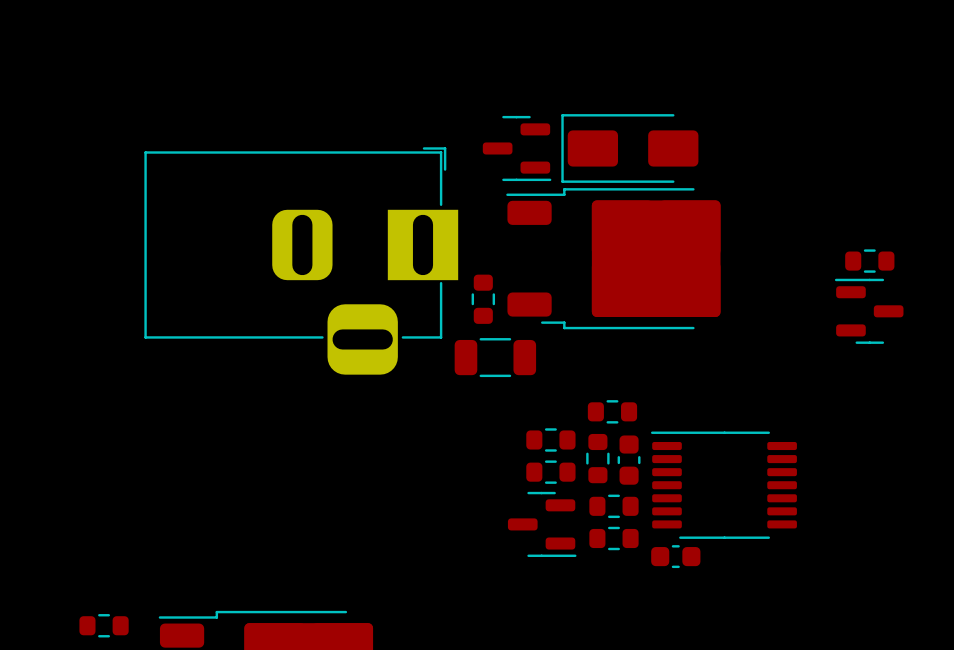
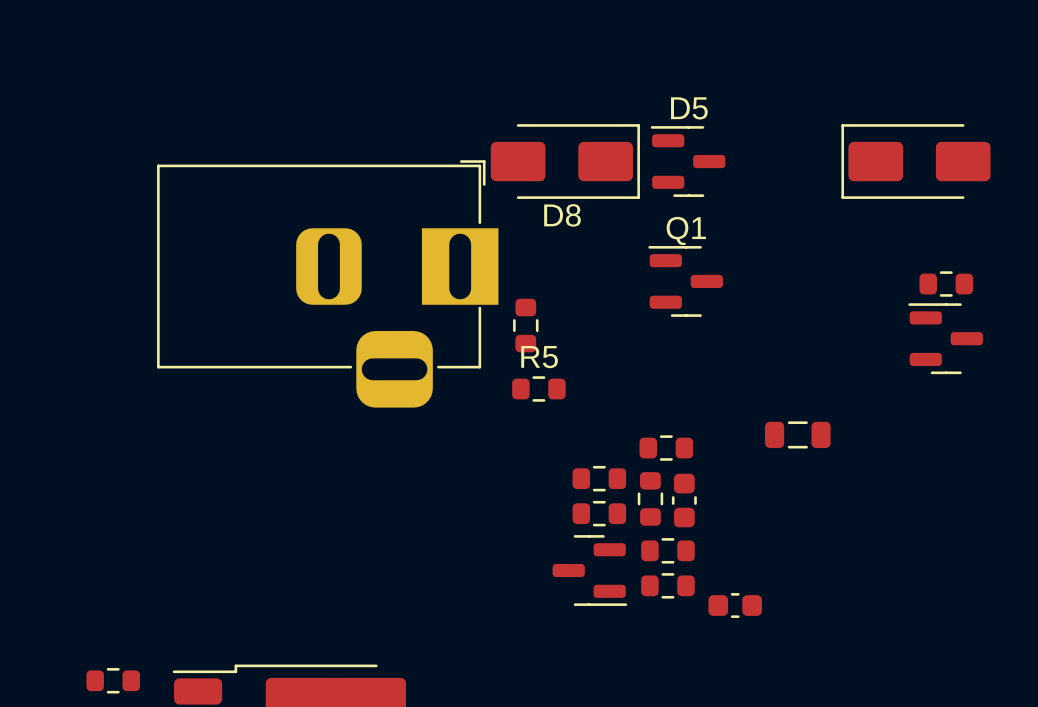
part: (517, 148) -> none
D8: none -> (565, 161)
part position: (629, 148) -> (915, 161)
D5: none -> (688, 161)
part: (613, 258) -> none
Q1: none -> (685, 281)
part: (495, 357) -> none
R5: none -> (538, 388)
part: none -> (797, 434)
part: (723, 485) -> none

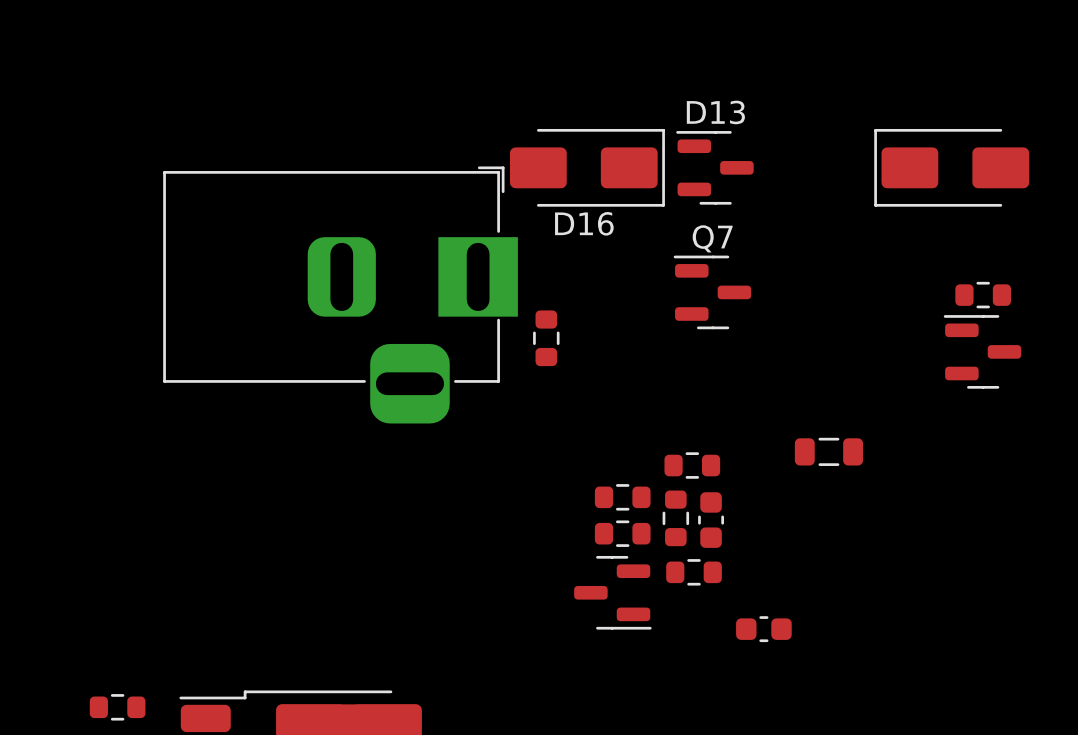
D5 name: D5 (689, 108) -> D13 (715, 112)
D8 name: D8 (562, 215) -> D16 (584, 223)
Q1 name: Q1 (686, 230) -> Q7 (712, 238)
R5: (538, 388) -> none
part: (667, 585) -> none

